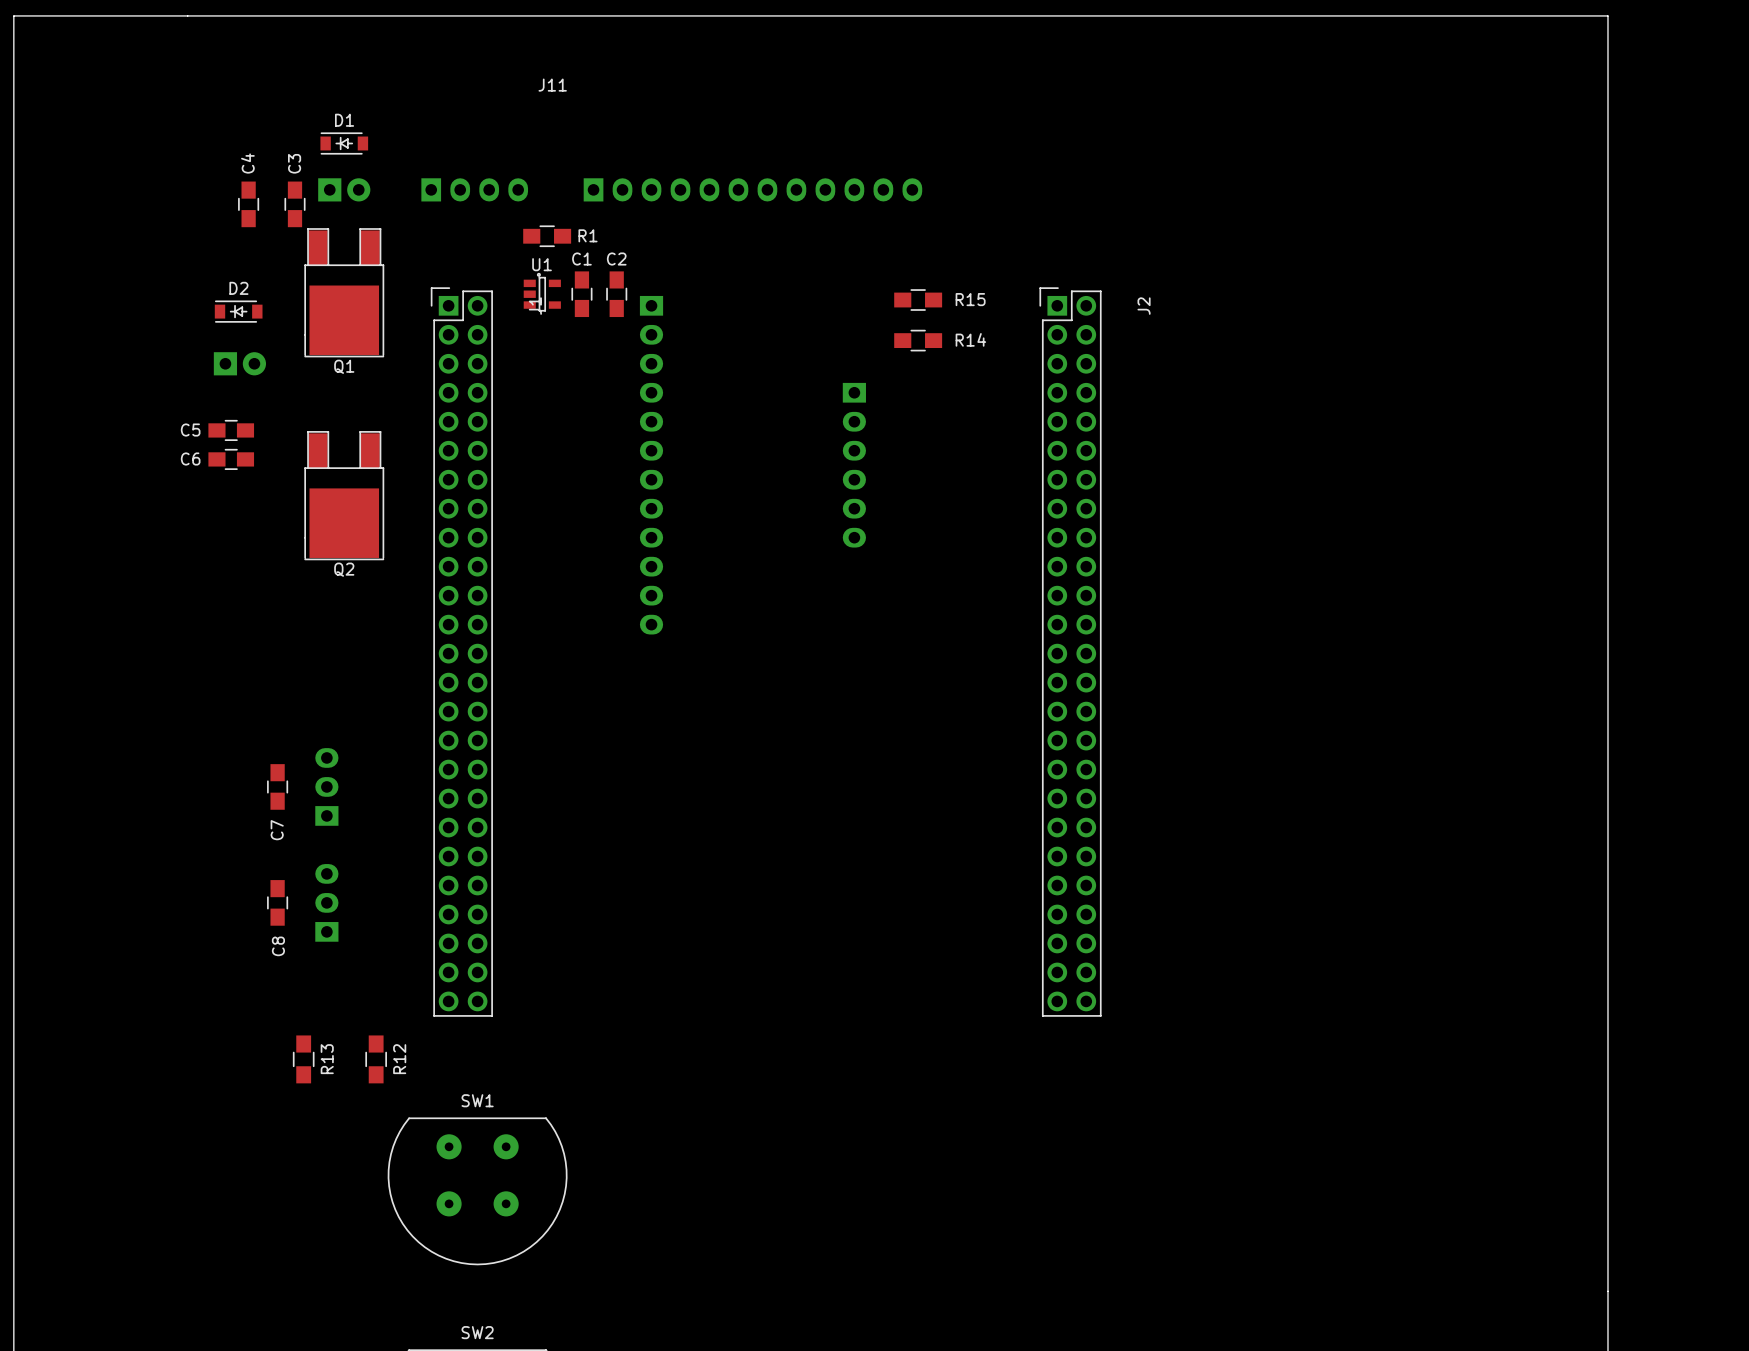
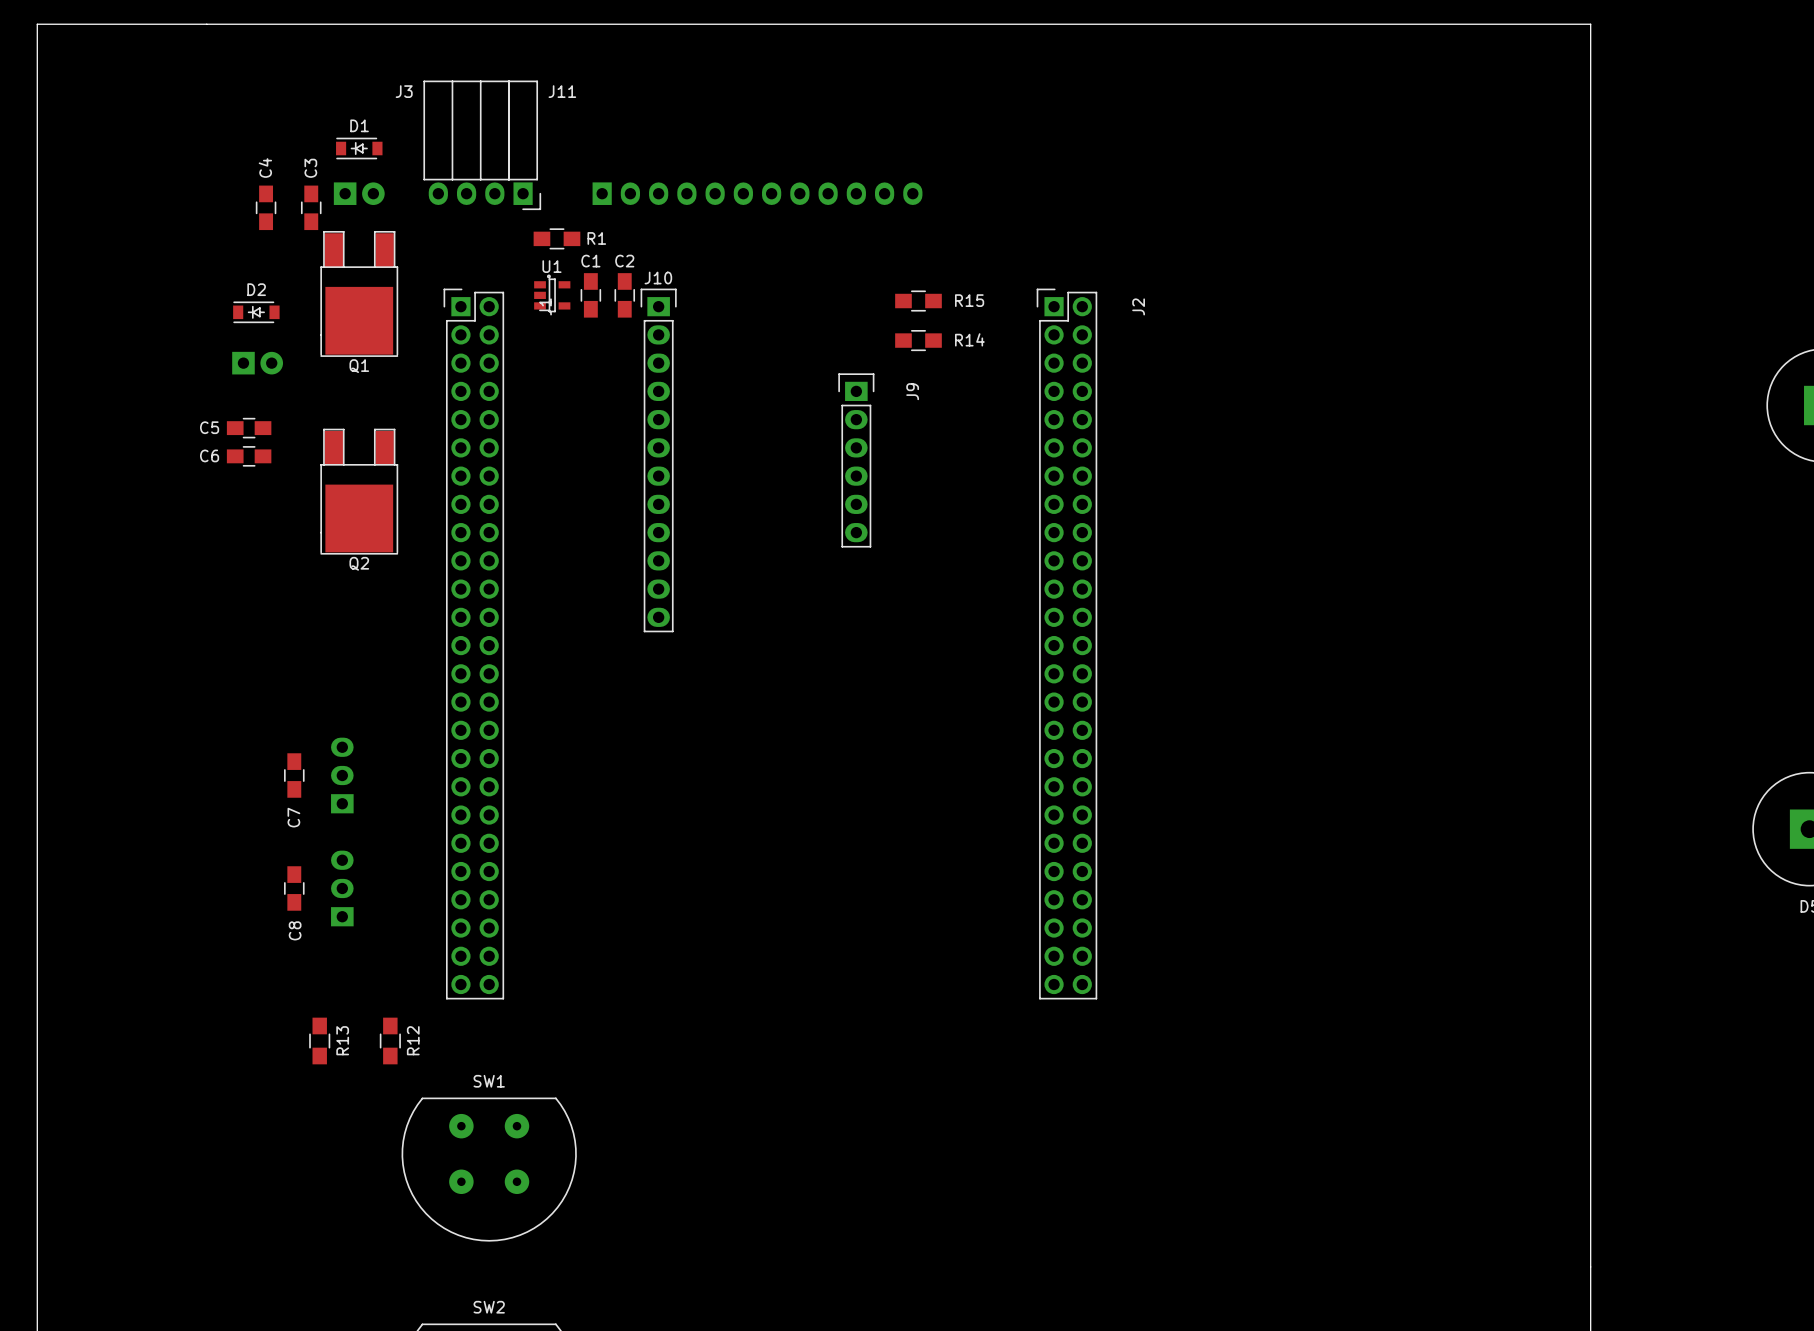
J3 side: bottom (474, 189) -> top (482, 145)
J10 side: bottom (651, 465) -> top (658, 460)
J9 side: bottom (854, 465) -> top (856, 460)

